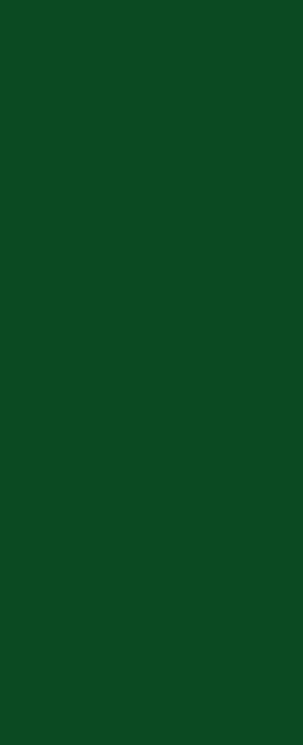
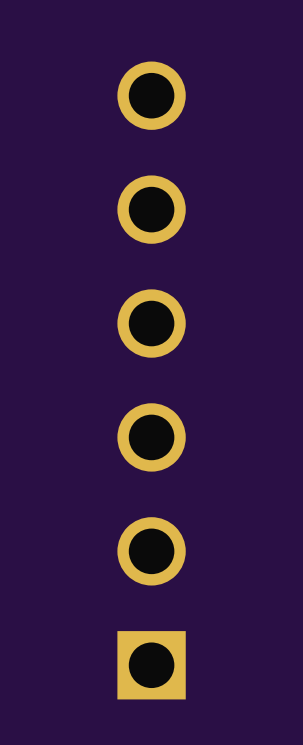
part: none -> (151, 380)

